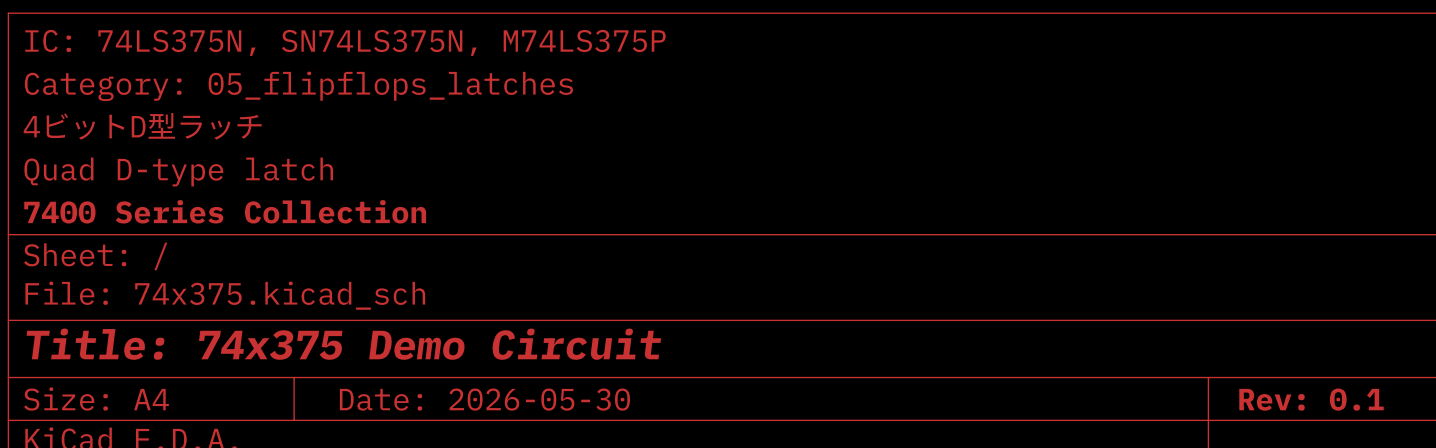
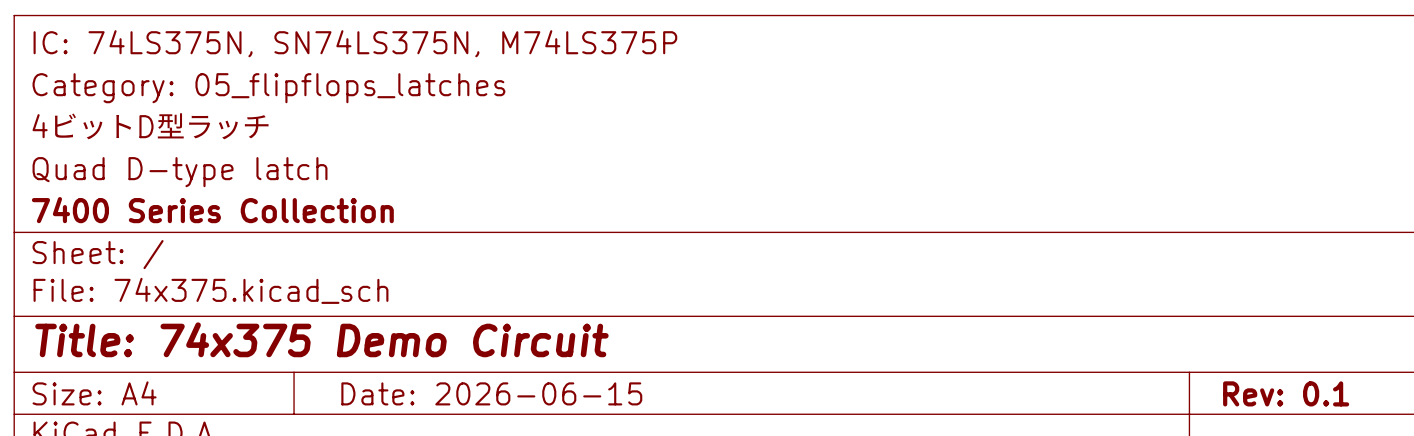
title block: Date: 2026-05-30 (484, 399) -> Date: 2026-06-15 (491, 393)

